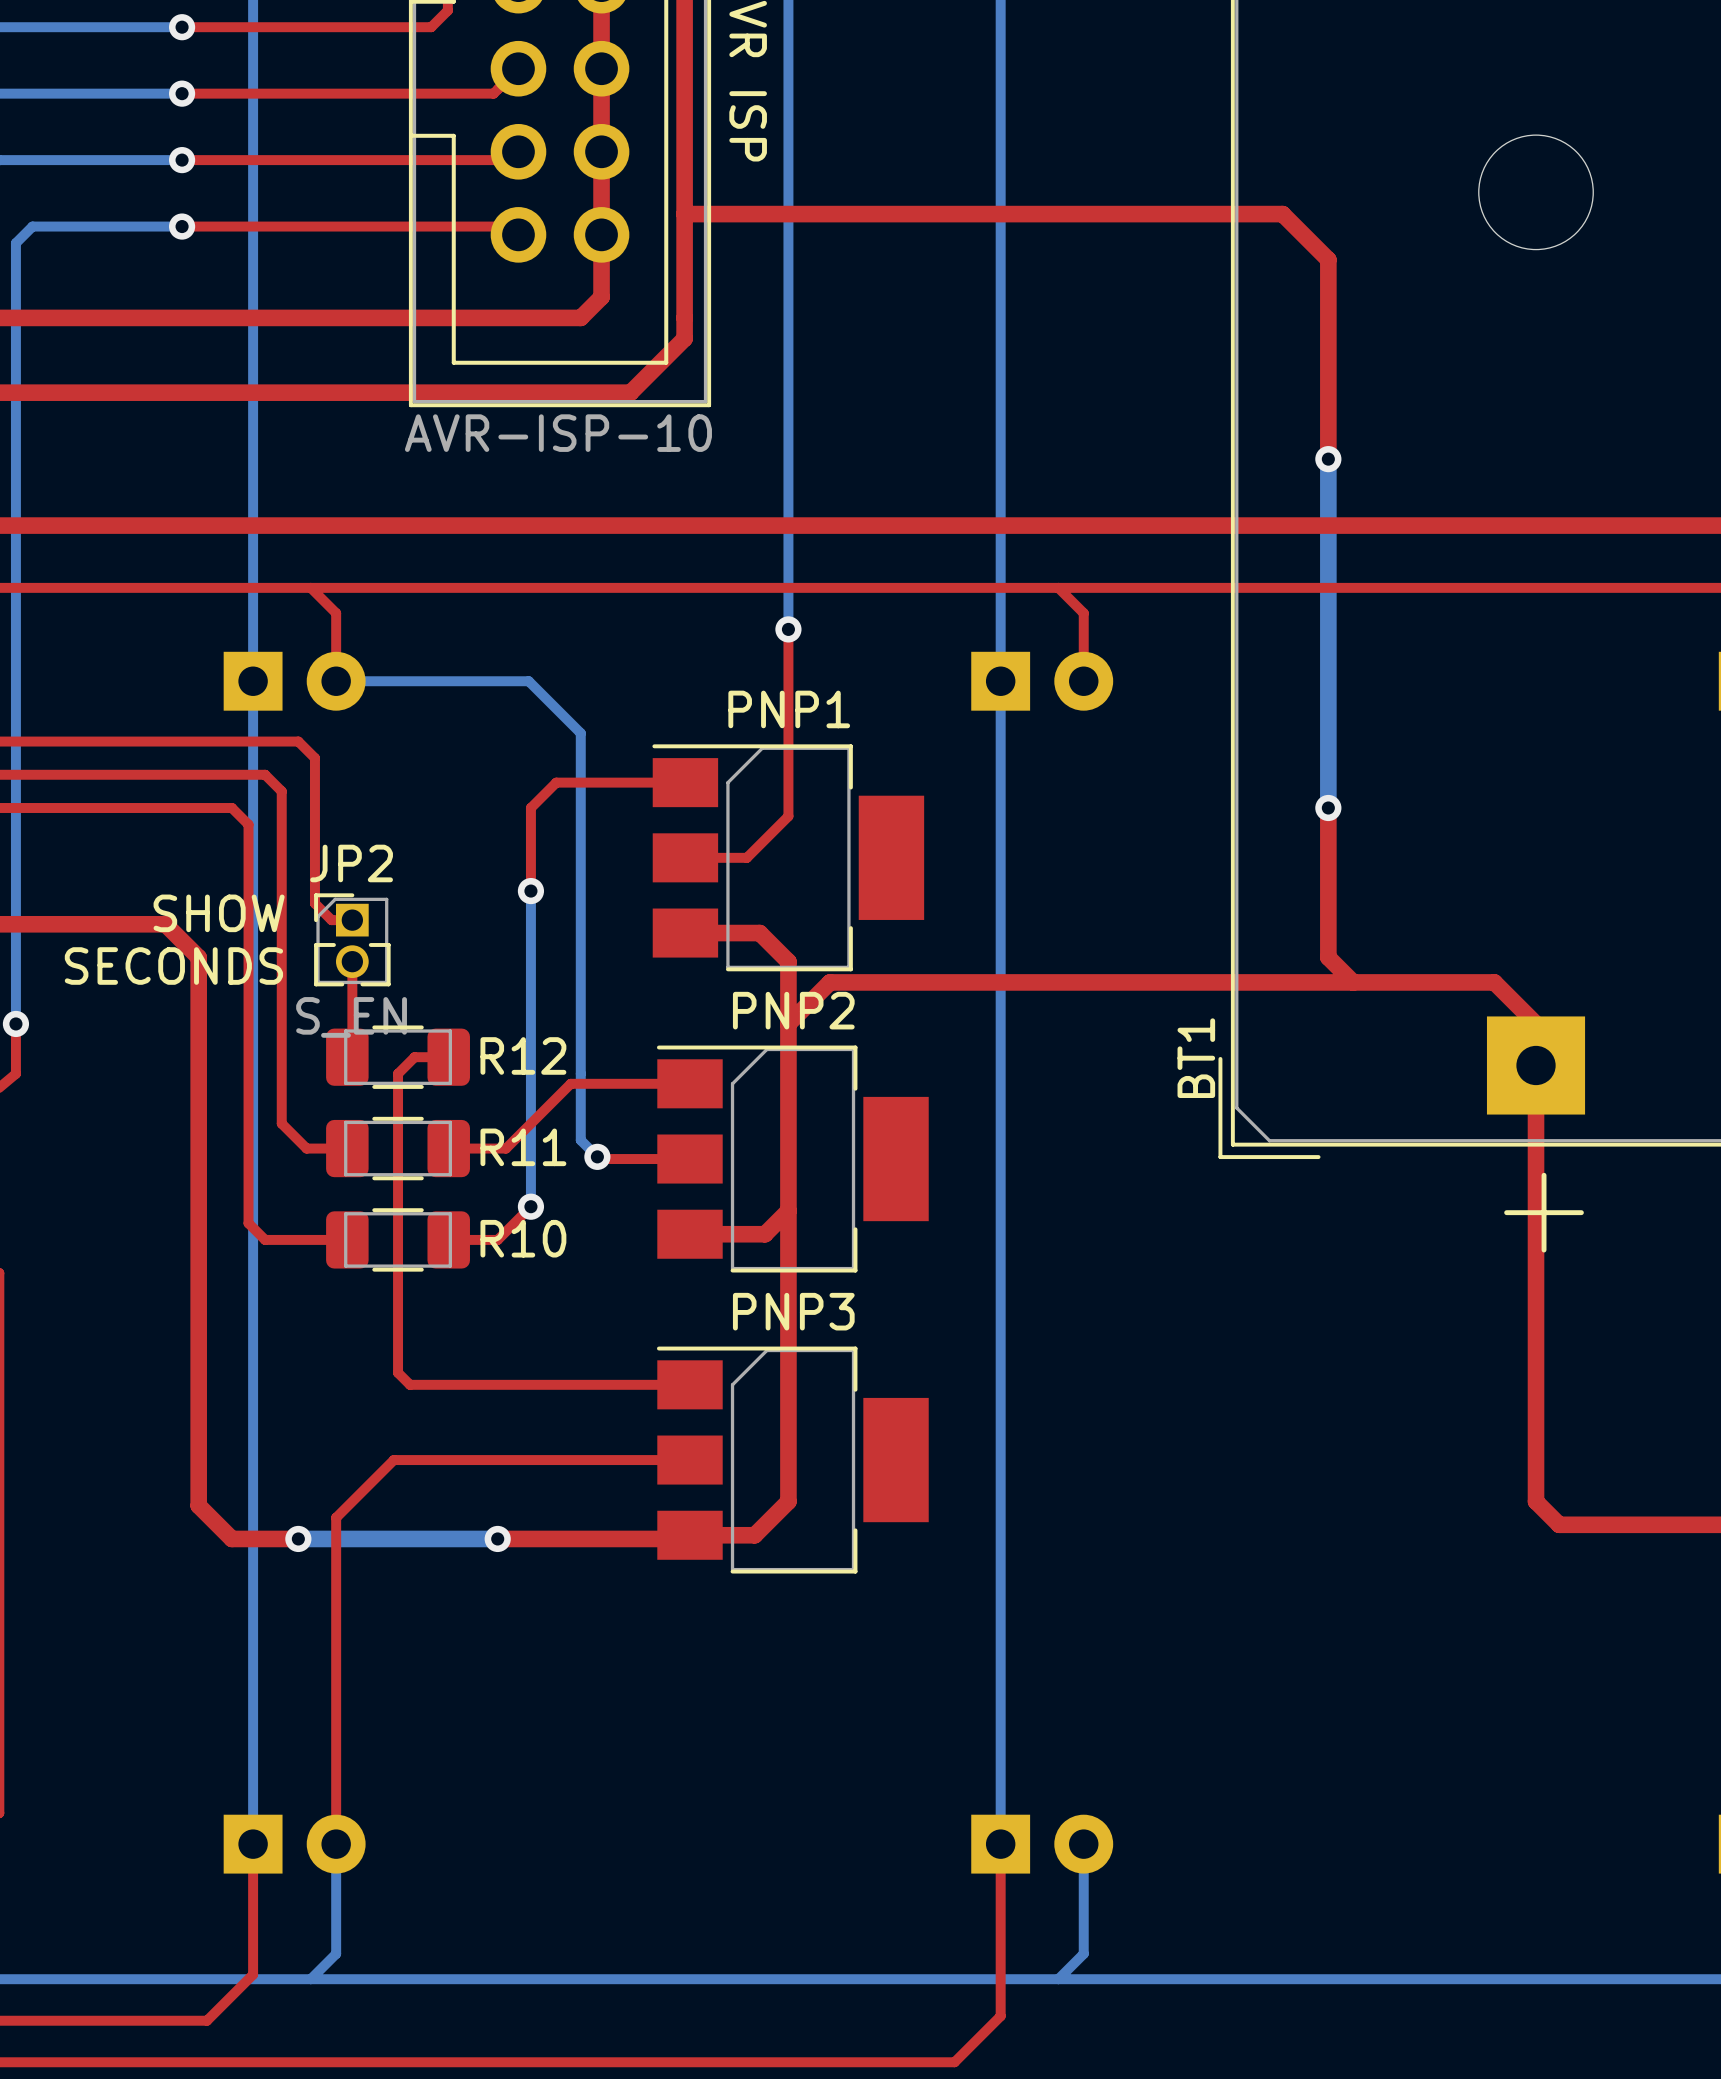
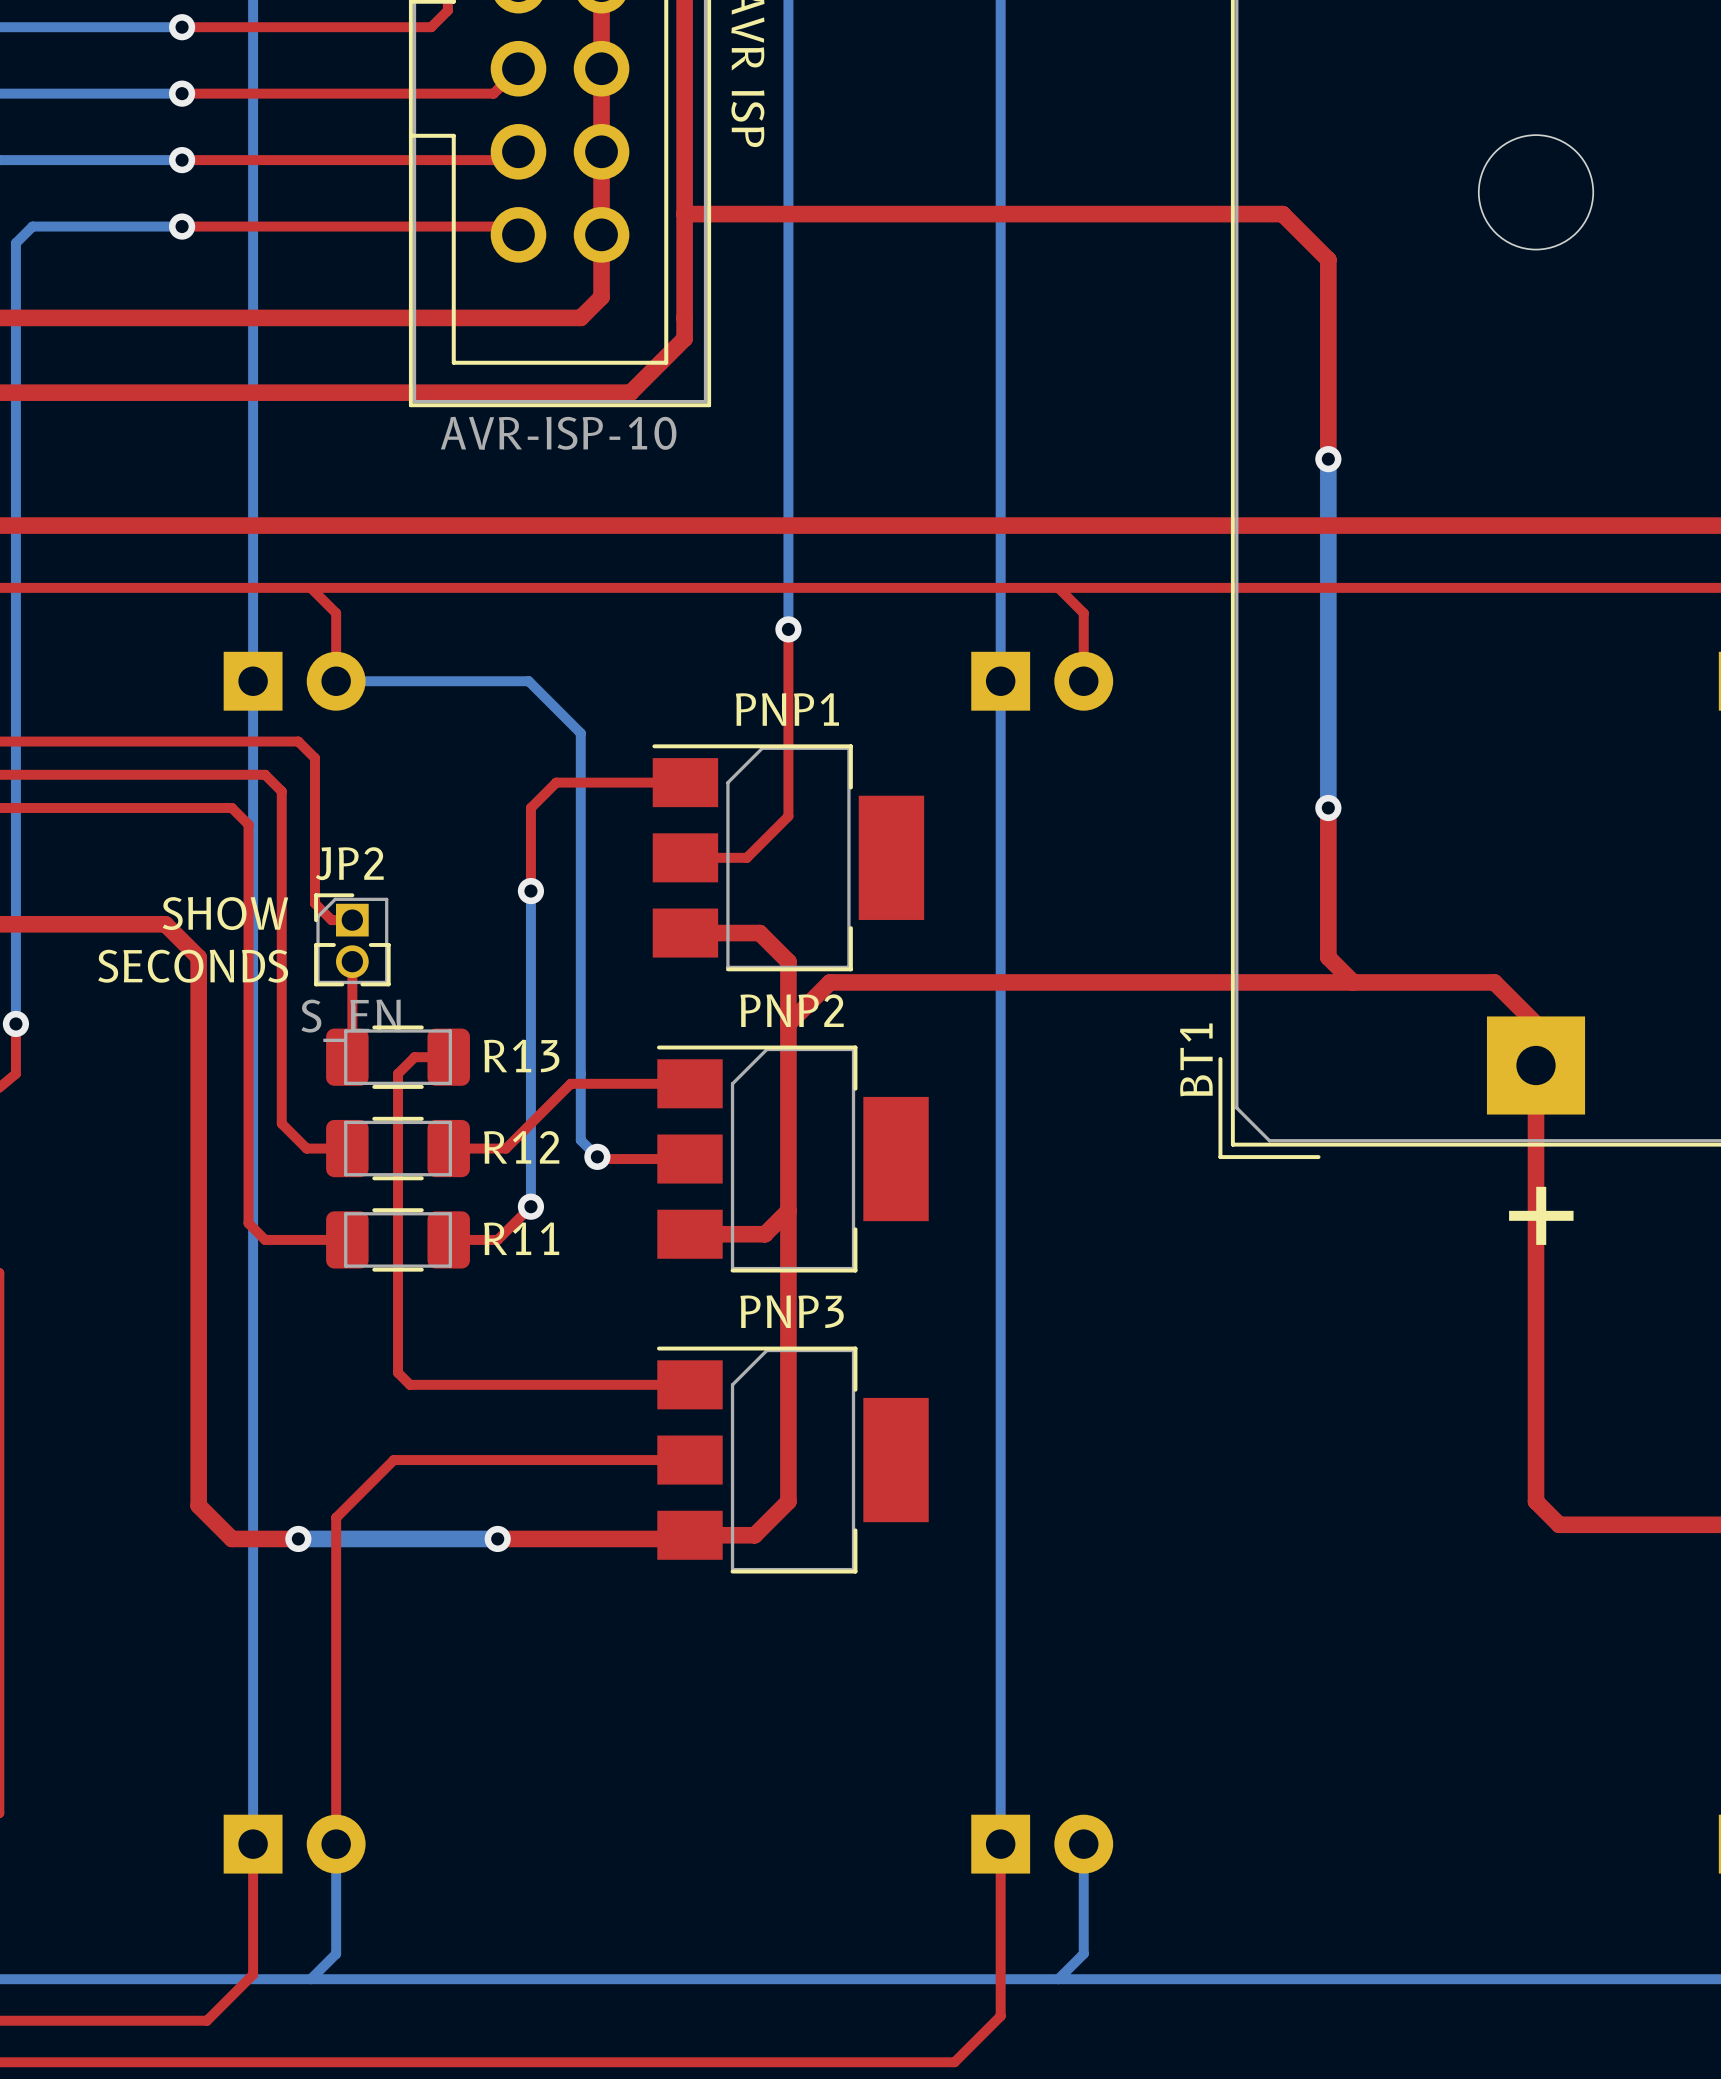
R12 name: R12 (523, 1055) -> R13 (521, 1055)
R11 name: R11 (523, 1147) -> R12 (521, 1147)
R10 name: R10 (523, 1238) -> R11 (521, 1238)

